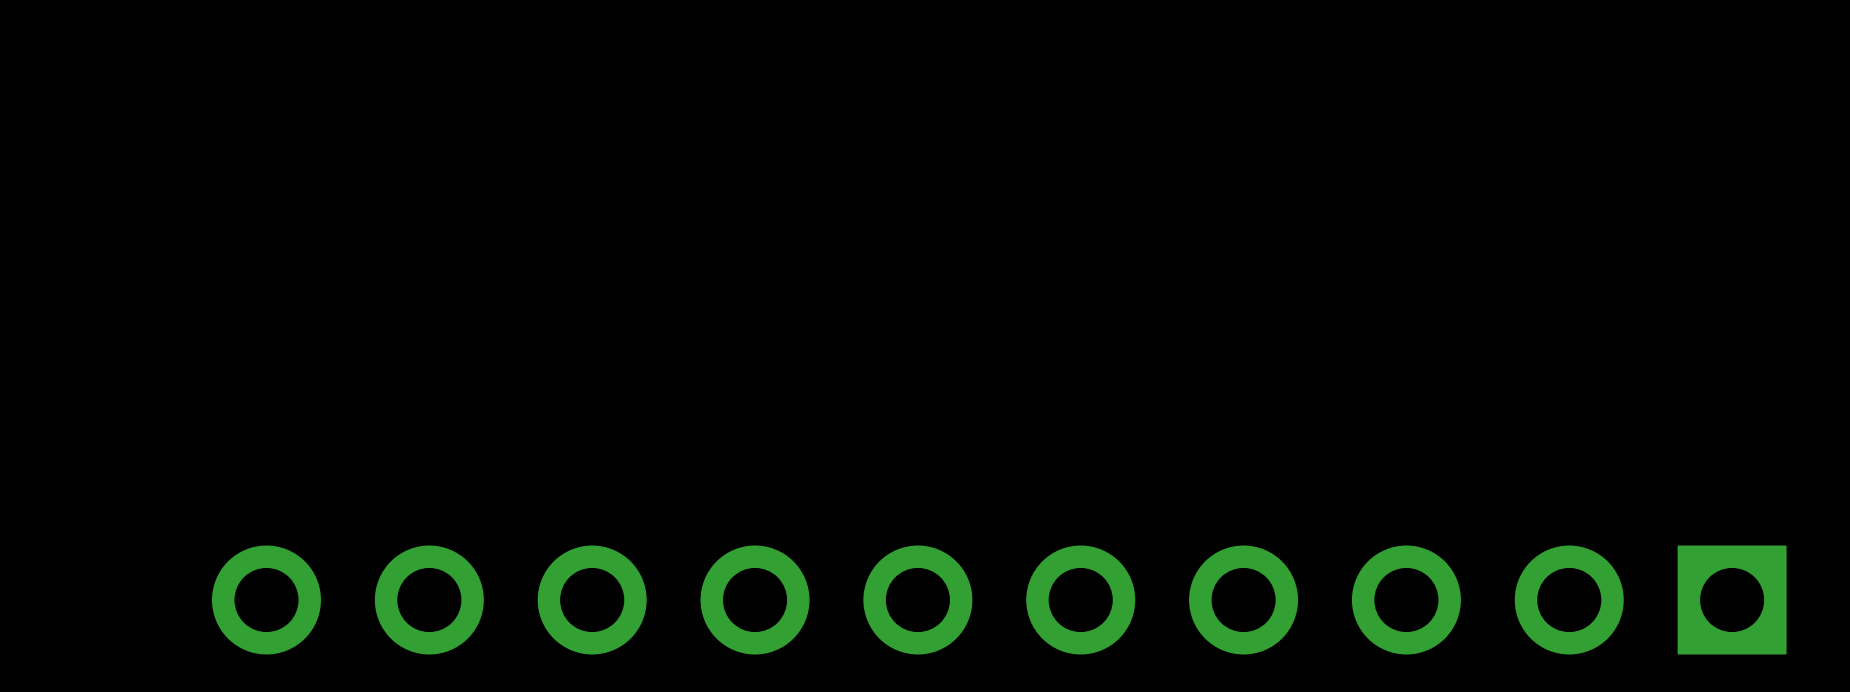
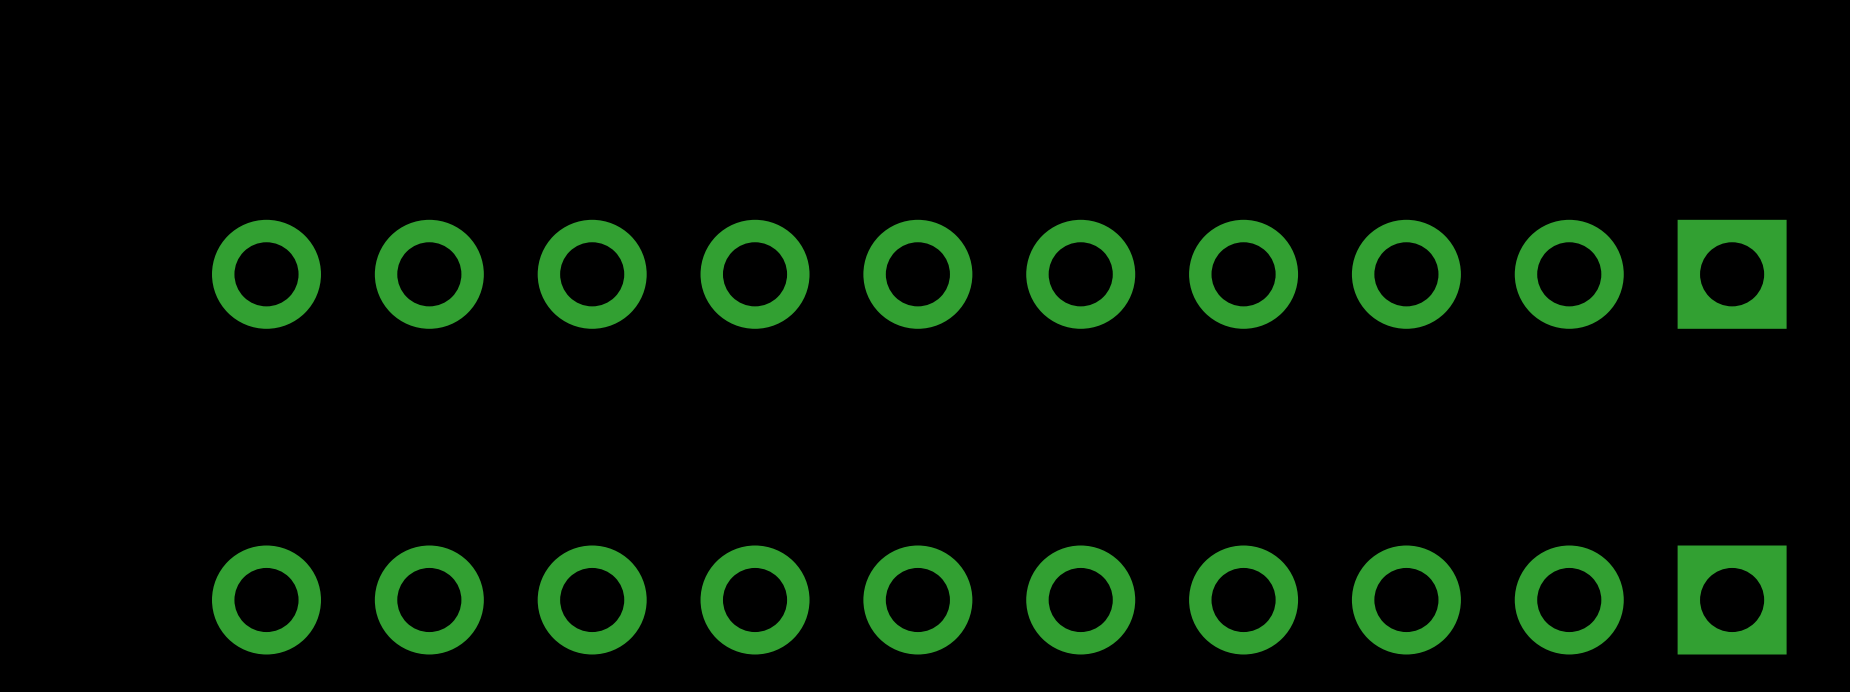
part: none -> (999, 274)

